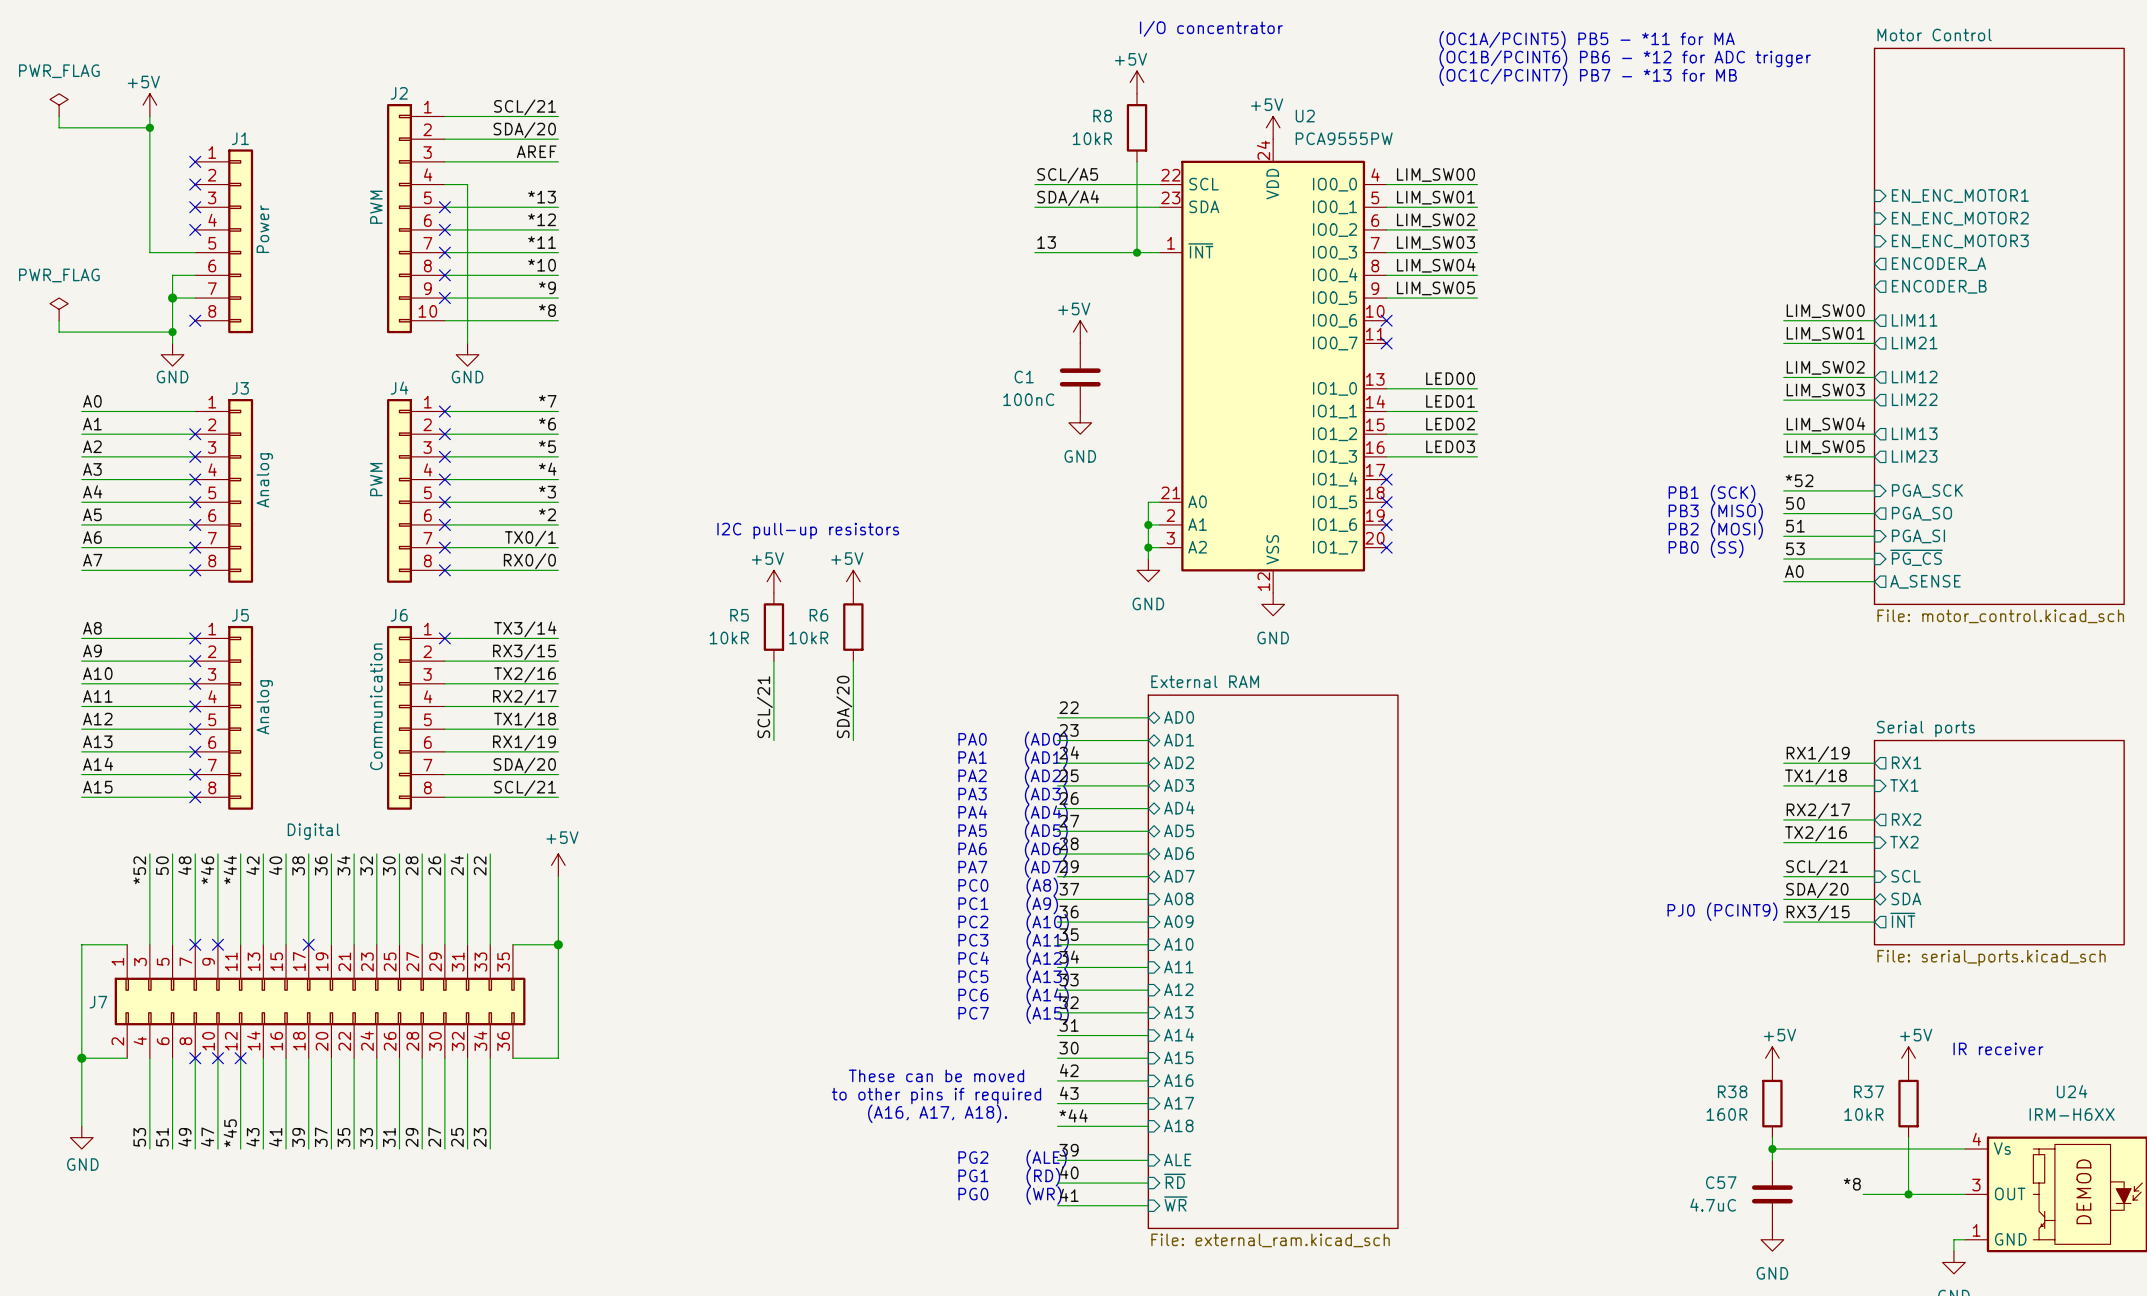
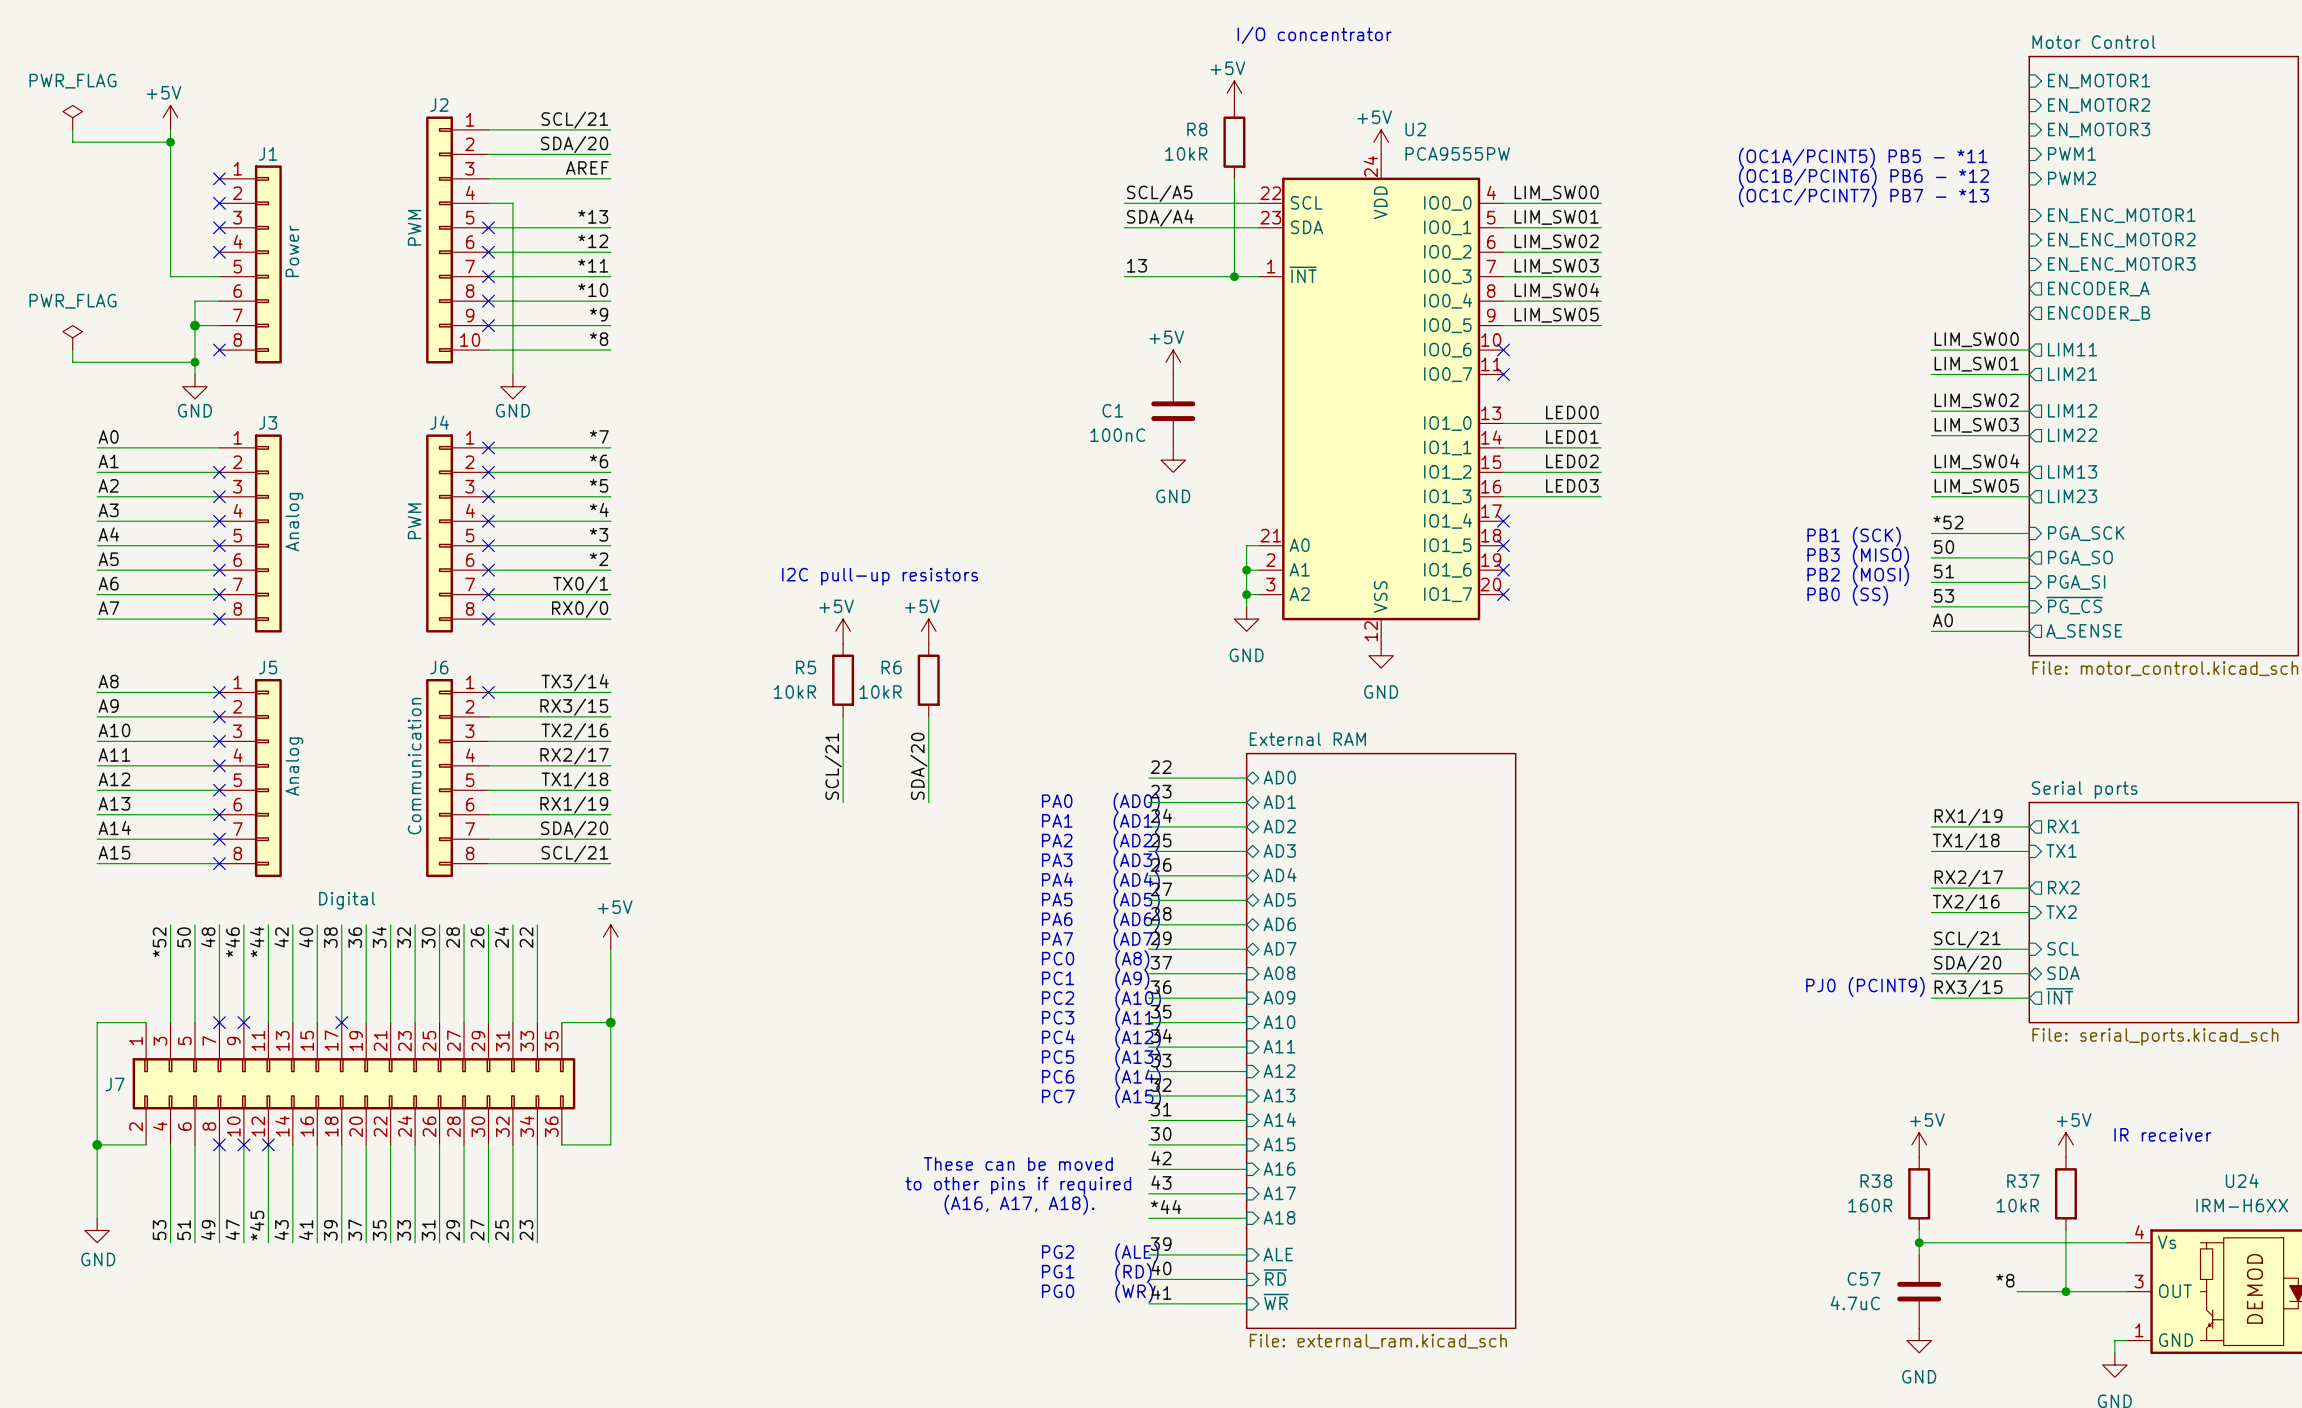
text: (OC1A/PCINT5) PB5 - *11 for MA (1587, 40) -> none
text: (OC1B/PCINT6) PB6 - *12 for ADC trigger (1625, 58) -> none
sheet pin: none -> EN_MOTOR1 (2099, 81)
text: (OC1C/PCINT7) PB7 - *13 for MB (1588, 76) -> none
sheet pin: none -> EN_MOTOR2 (2099, 105)
sheet pin: none -> EN_MOTOR3 (2099, 130)
sheet pin: none -> PWM1 (2071, 153)
text: none -> (OC1A/PCINT5) PB5 - *11 (1863, 157)
text: none -> (OC1B/PCINT6) PB6 - *12 (1863, 177)
sheet pin: none -> PWM2 (2071, 178)
text: none -> (OC1C/PCINT7) PB7 - *13 (1863, 197)

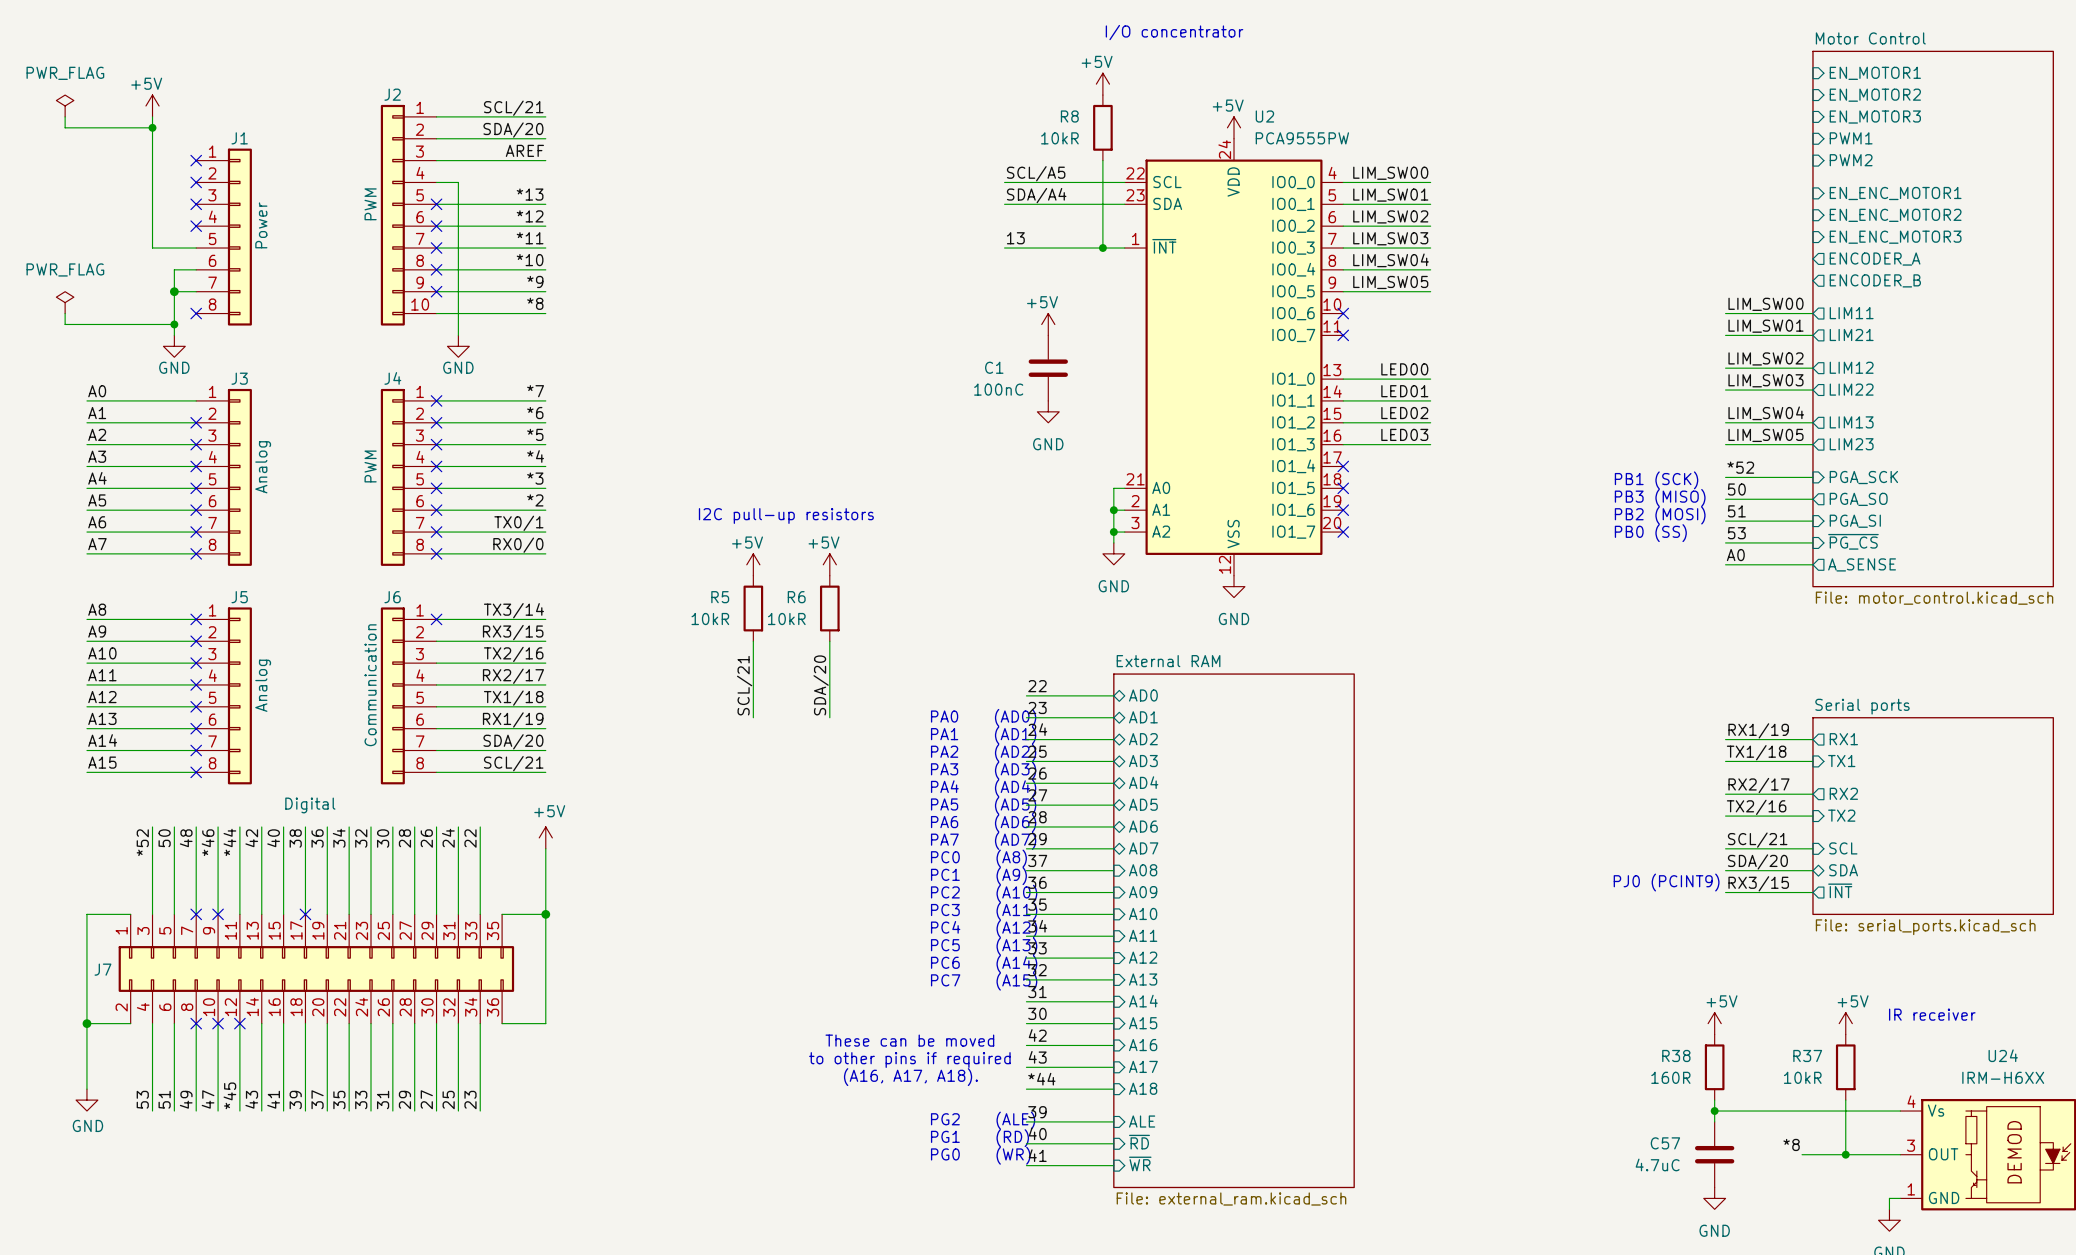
text: (OC1A/PCINT5) PB5 - *11 (1863, 157) -> none
text: (OC1B/PCINT6) PB6 - *12 (1863, 177) -> none
text: (OC1C/PCINT7) PB7 - *13 (1863, 197) -> none

